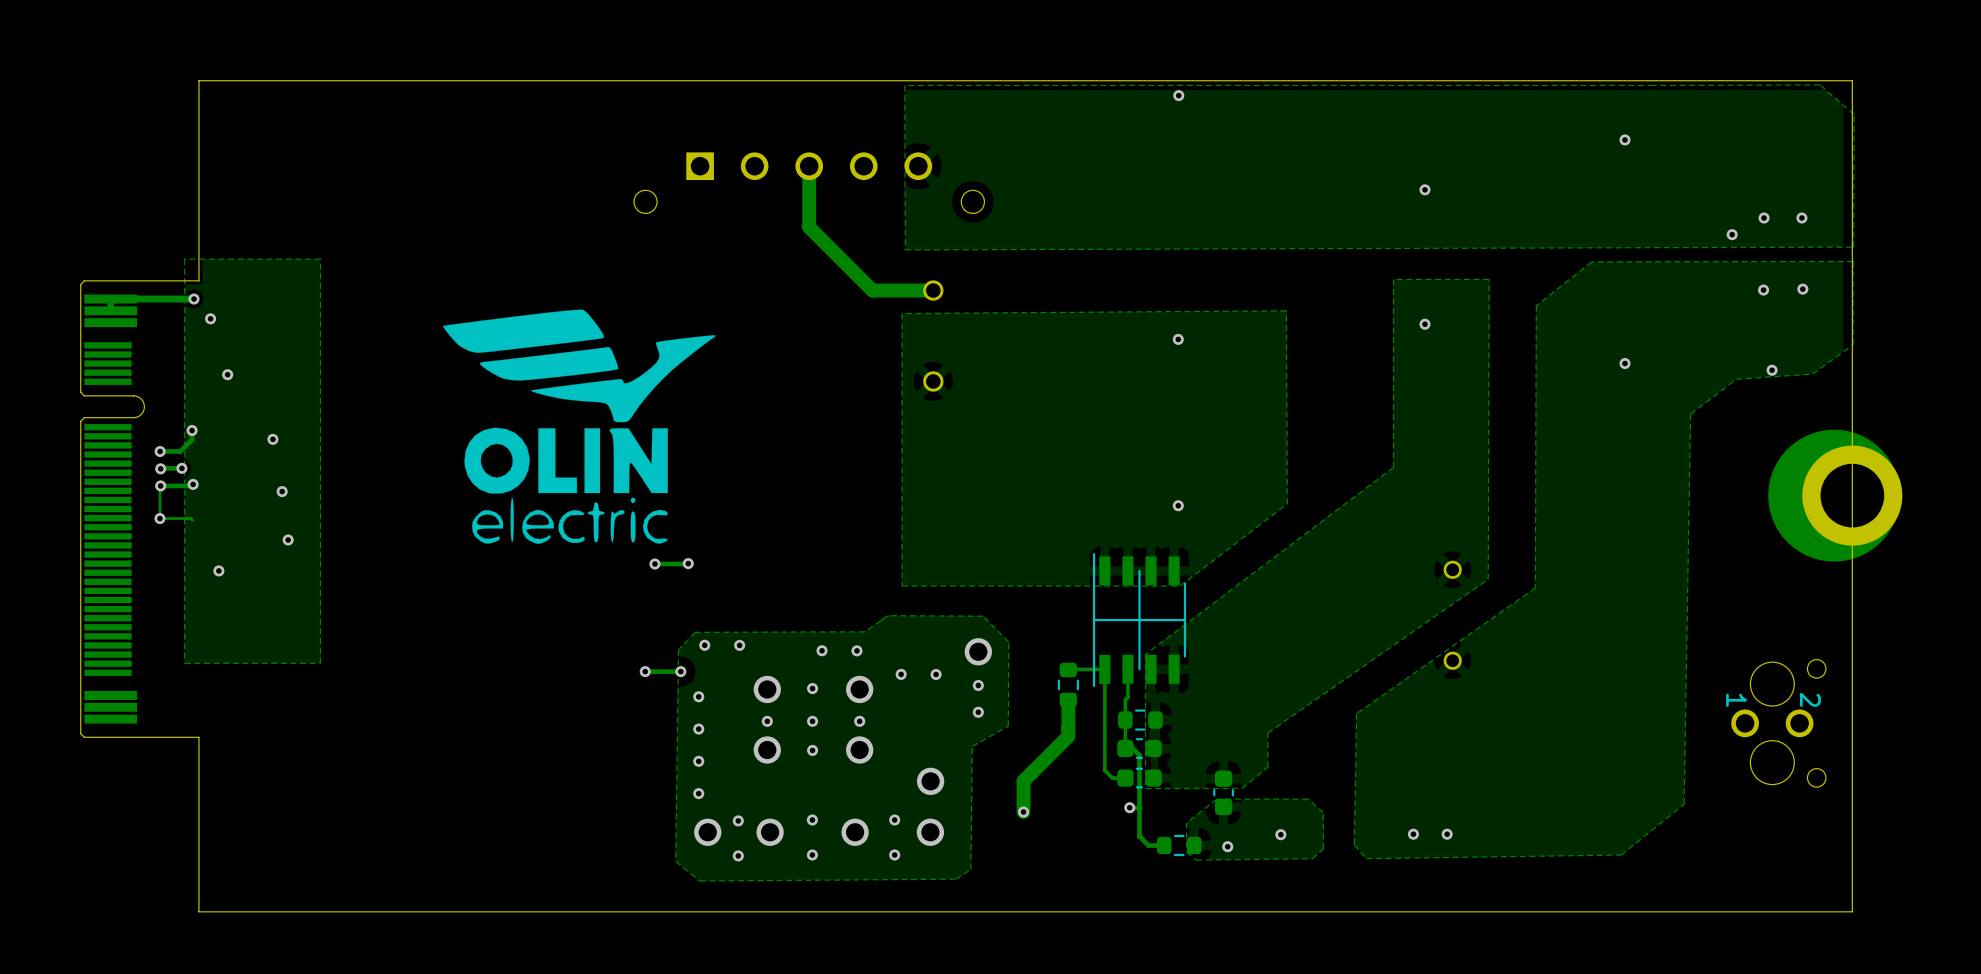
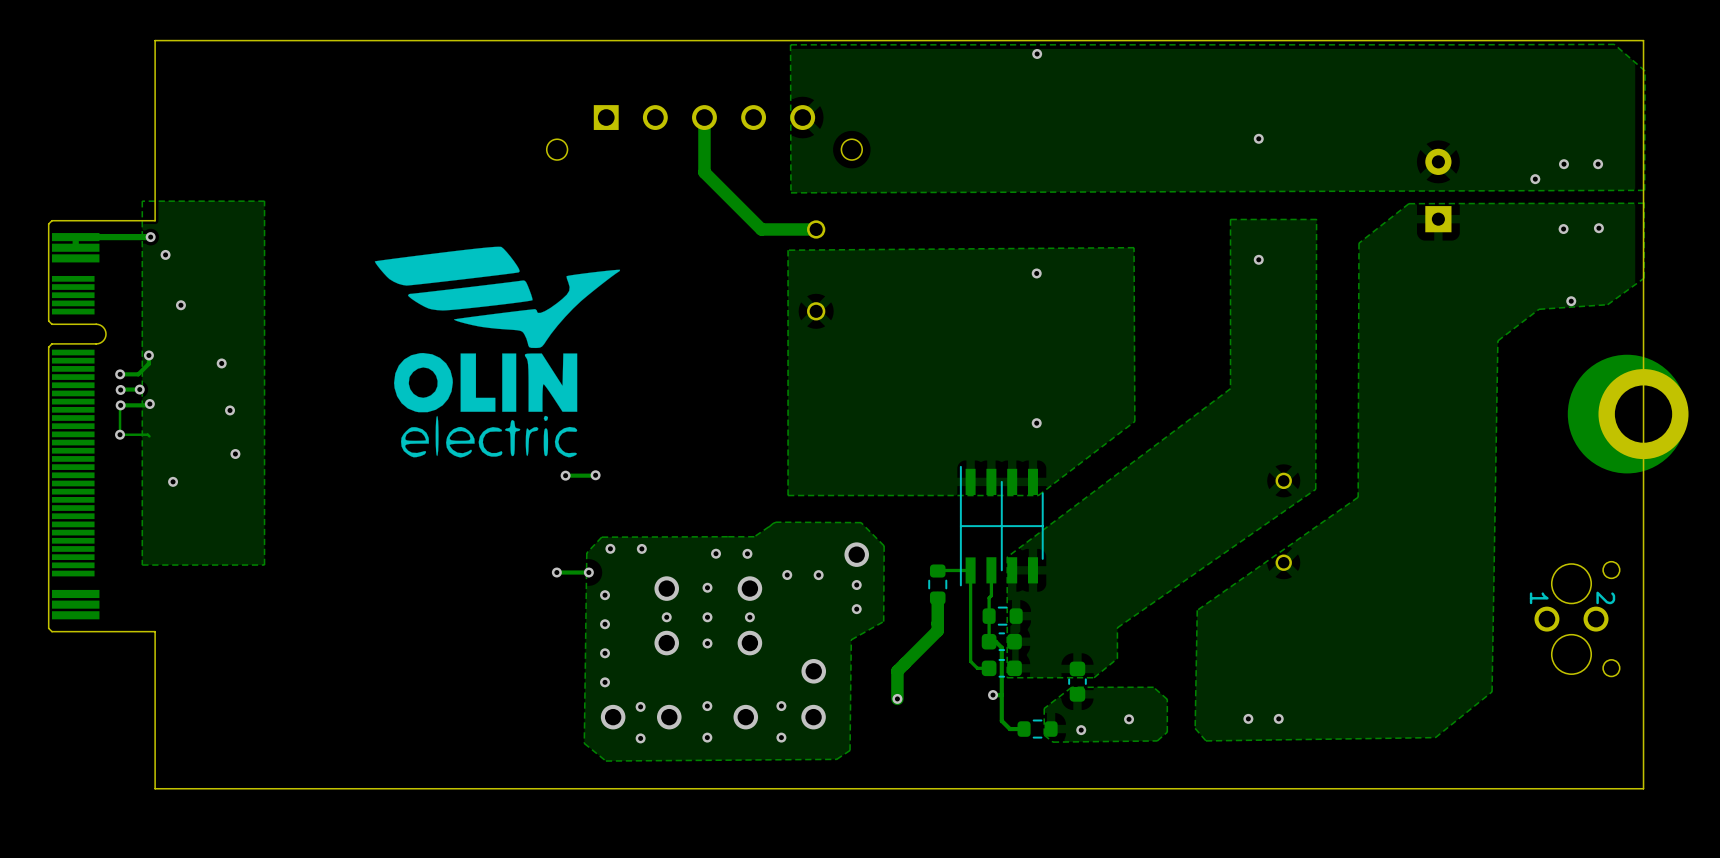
via: (1624, 139) -> none
part: none -> (1438, 190)
via: (1624, 363) -> none

